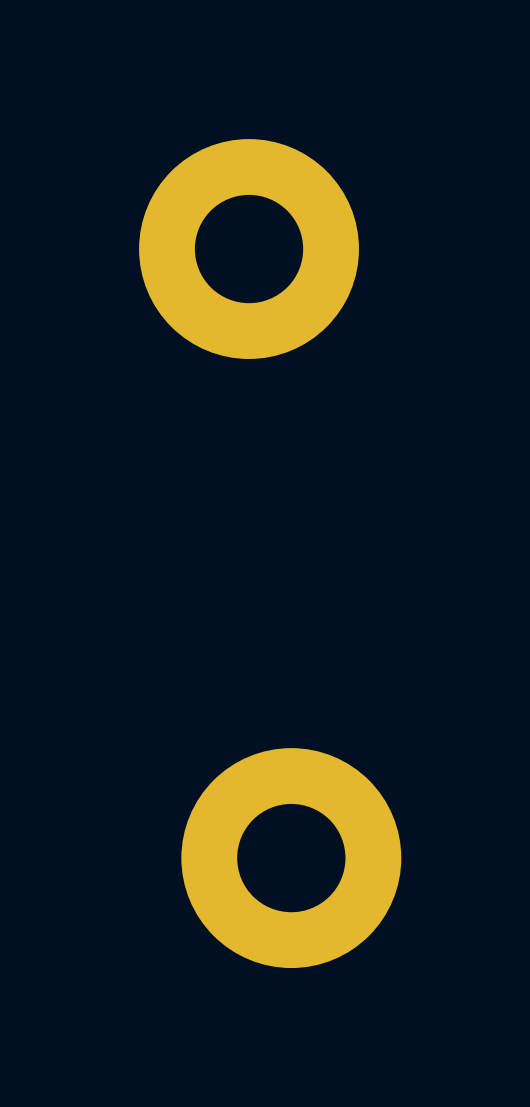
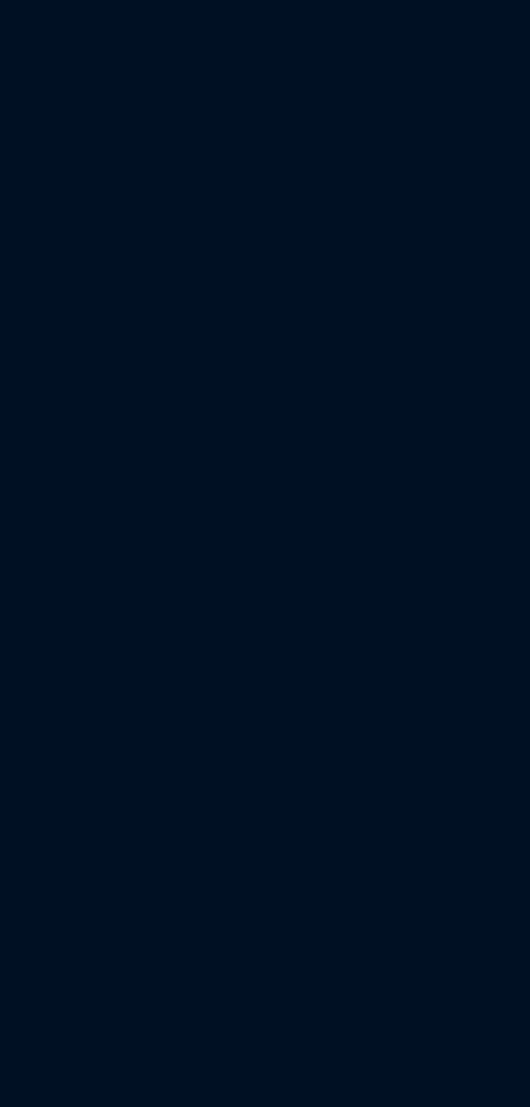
part: (249, 249) -> none
part: (291, 858) -> none

